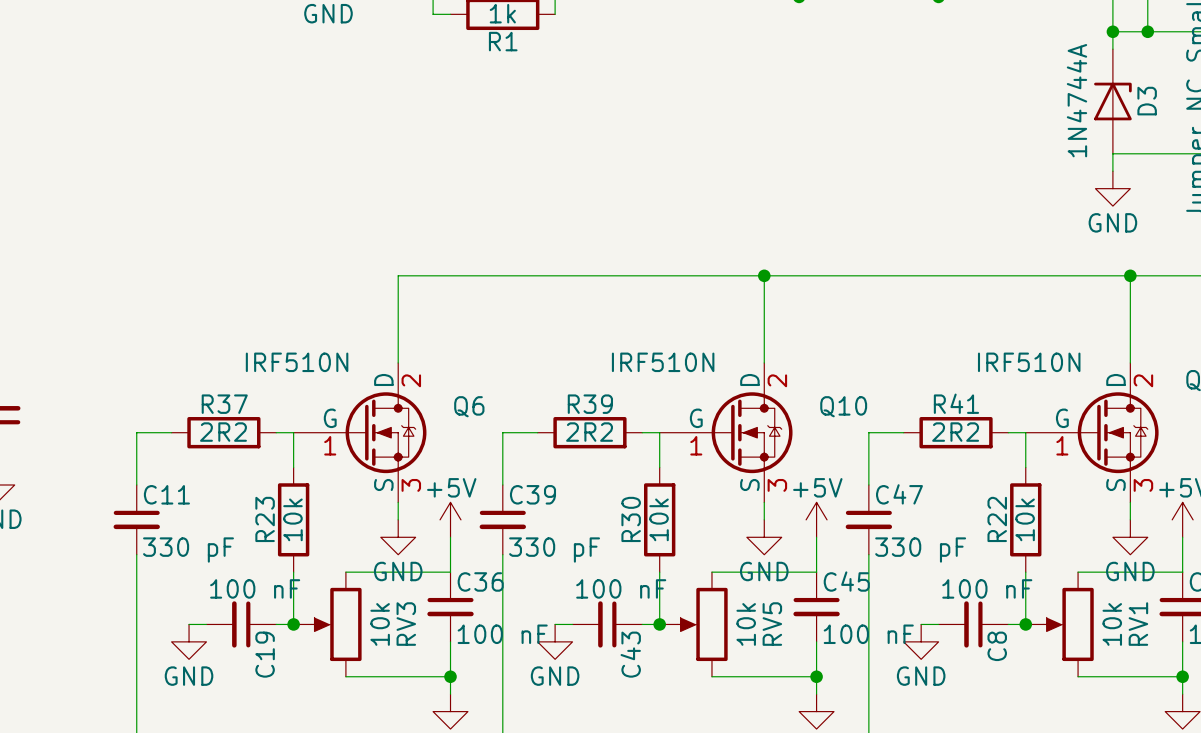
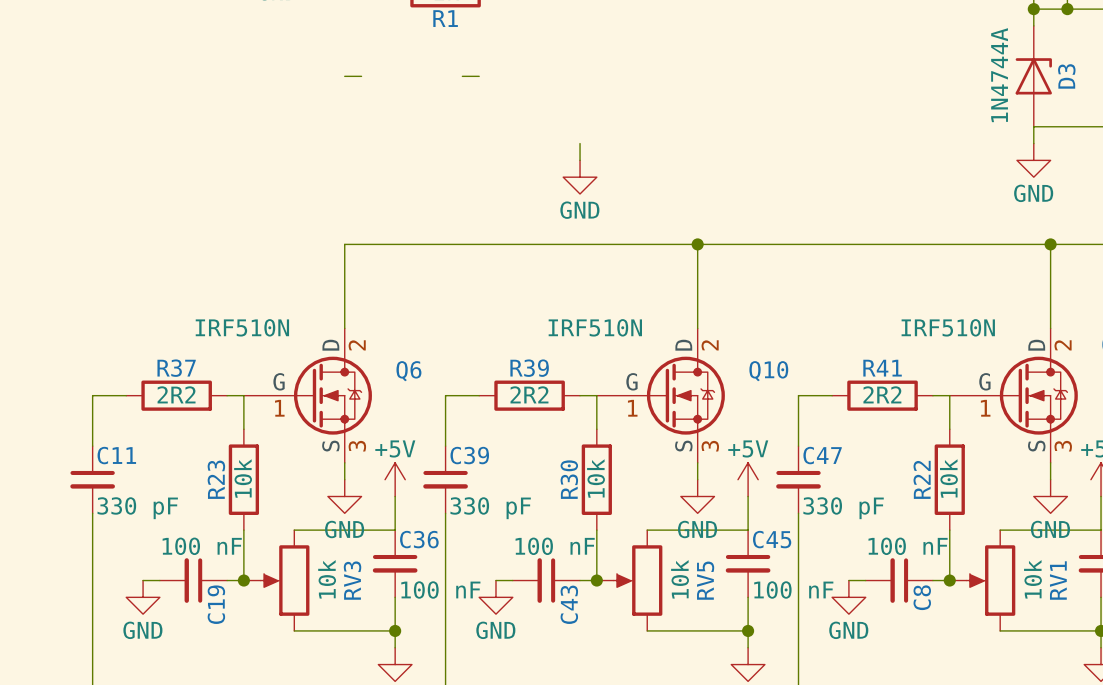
wire: none -> (344, 76) (361, 76)
wire: none -> (462, 76) (479, 76)
wire: none -> (580, 143) (580, 160)
power symbol: none -> GND (580, 177)

